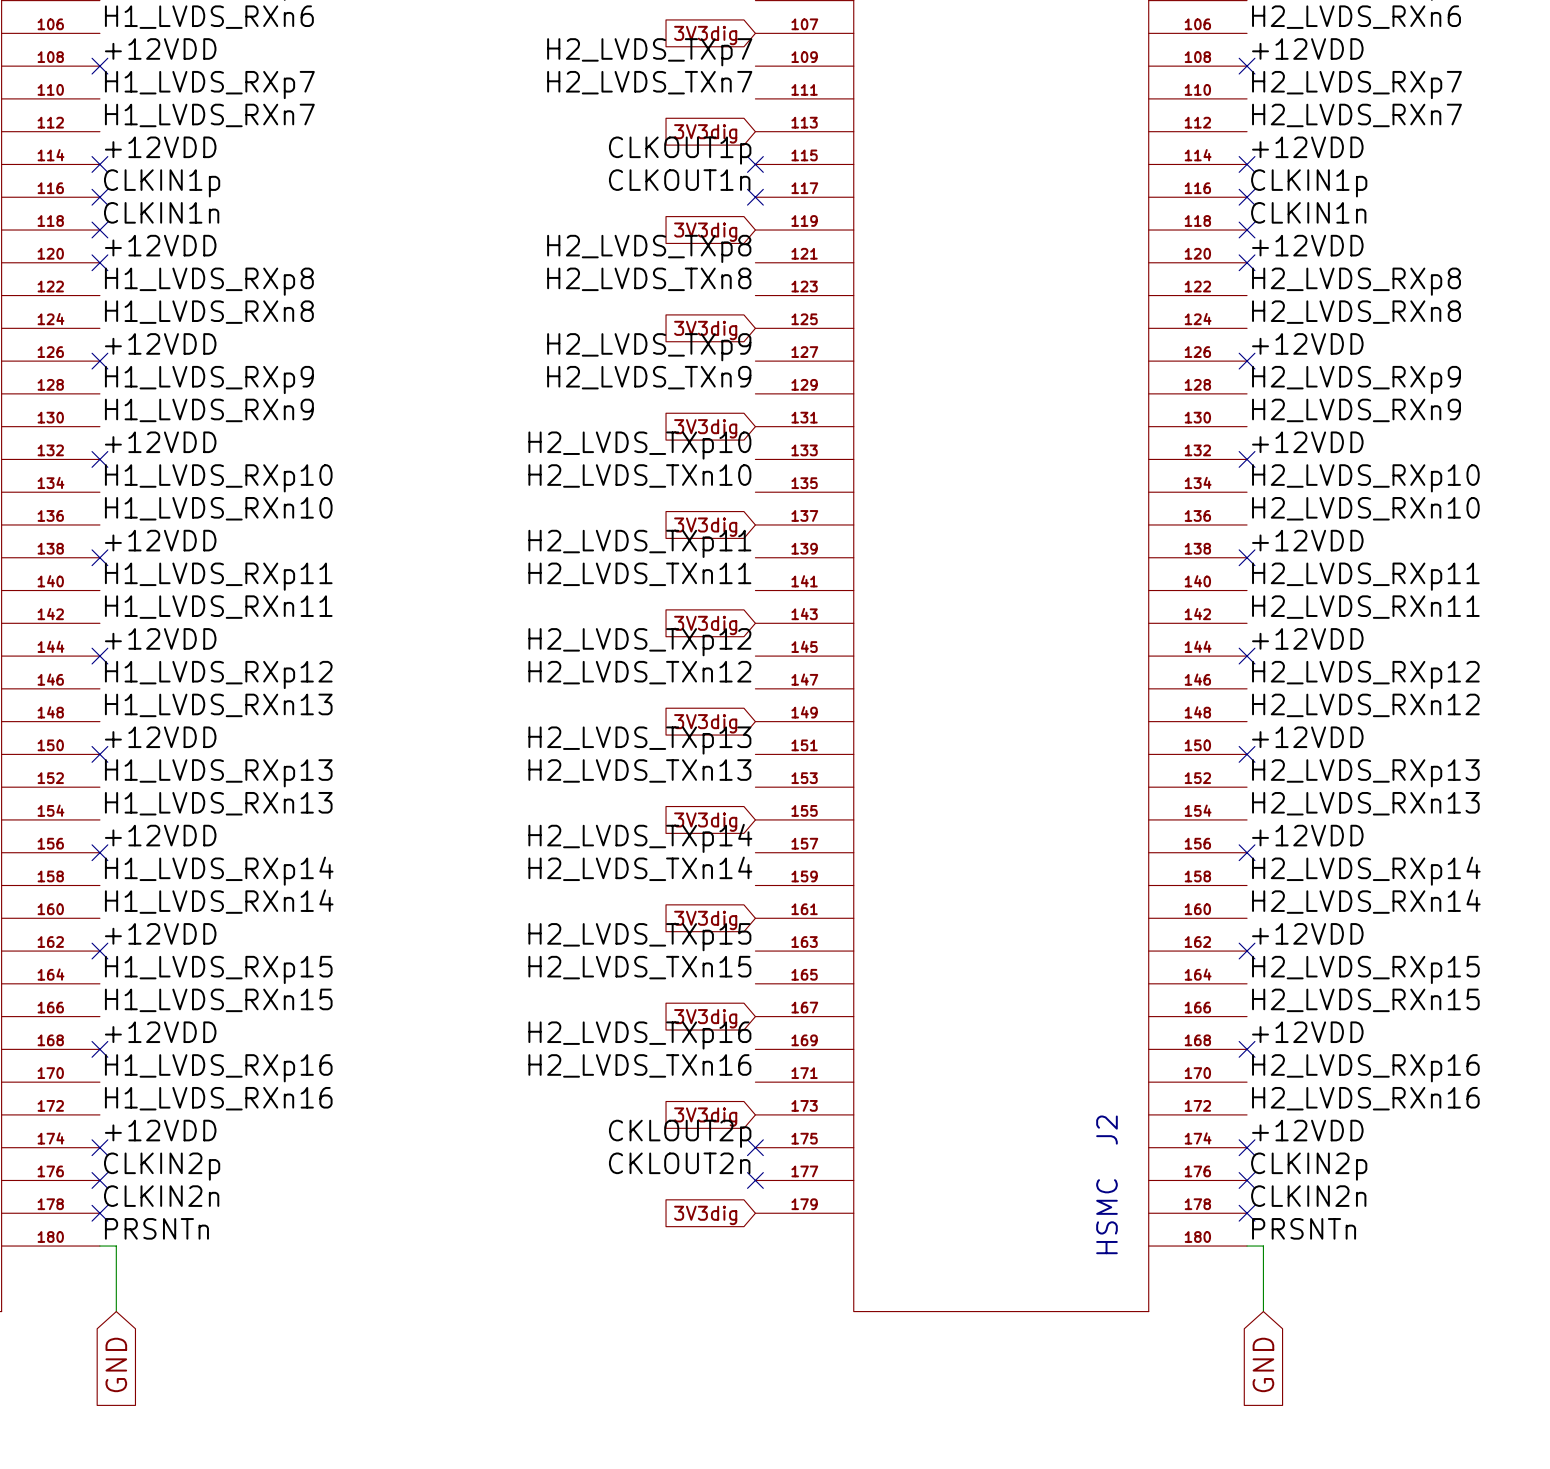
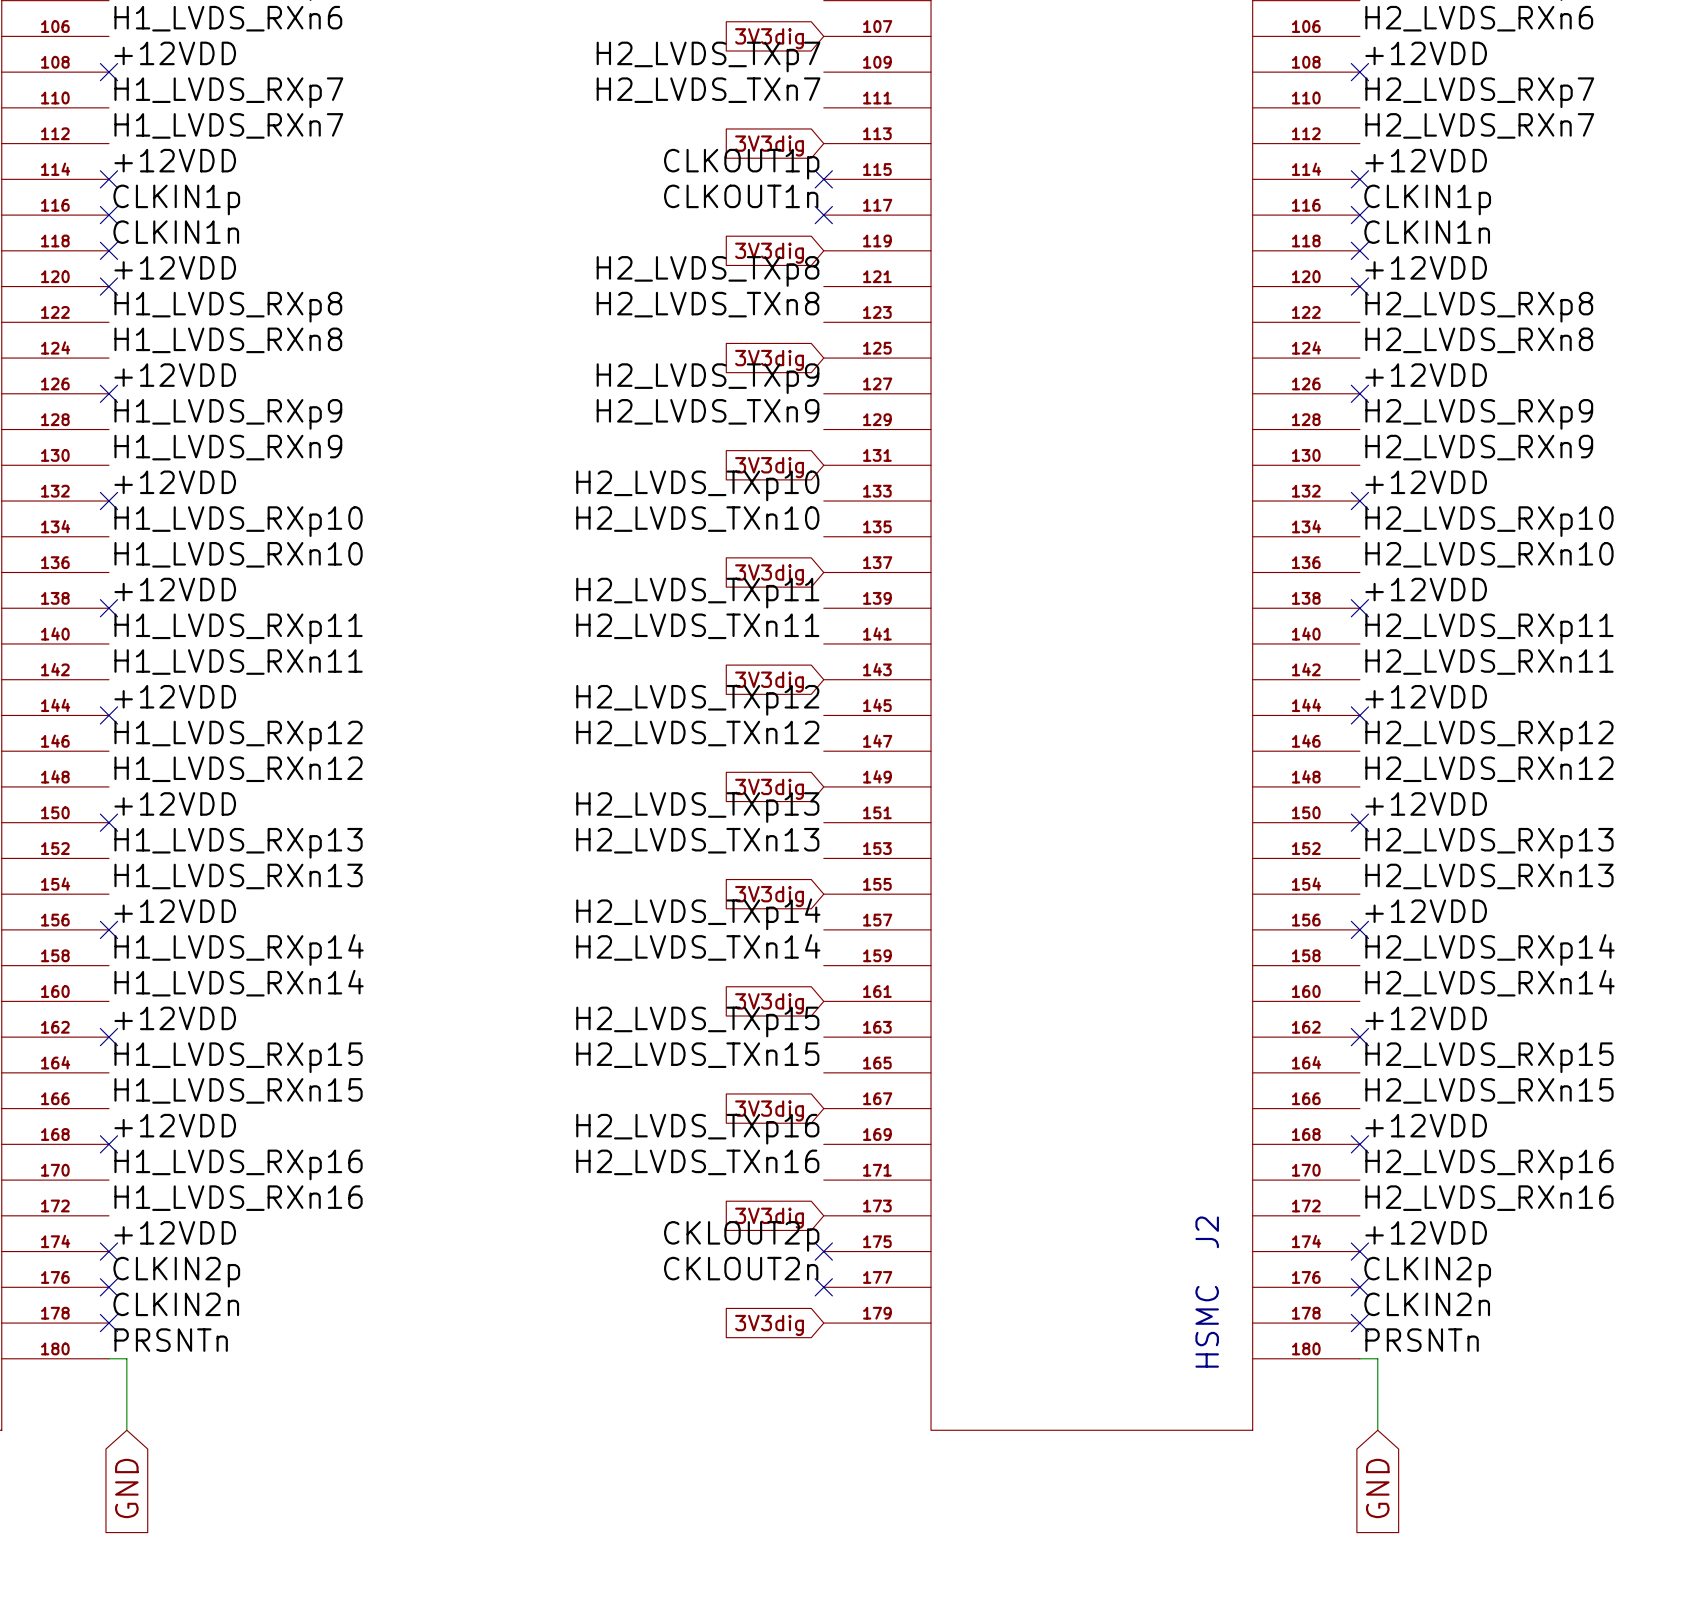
label: H1_LVDS_RXn13 (218, 705) -> H1_LVDS_RXn12 (238, 769)

